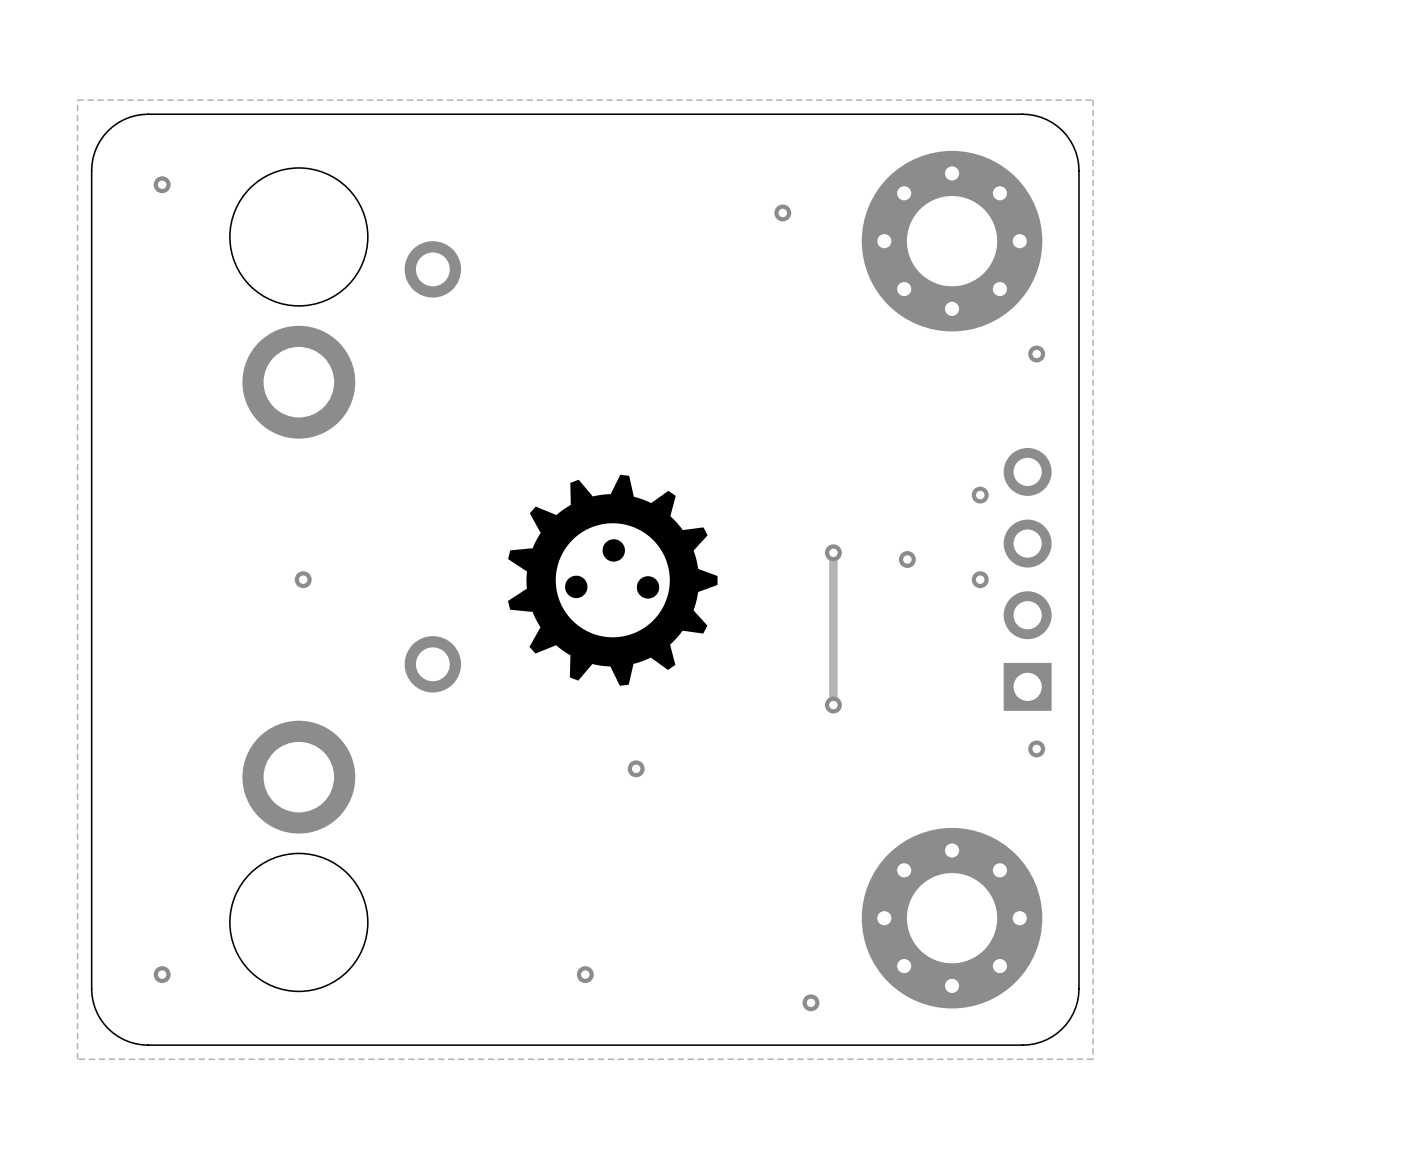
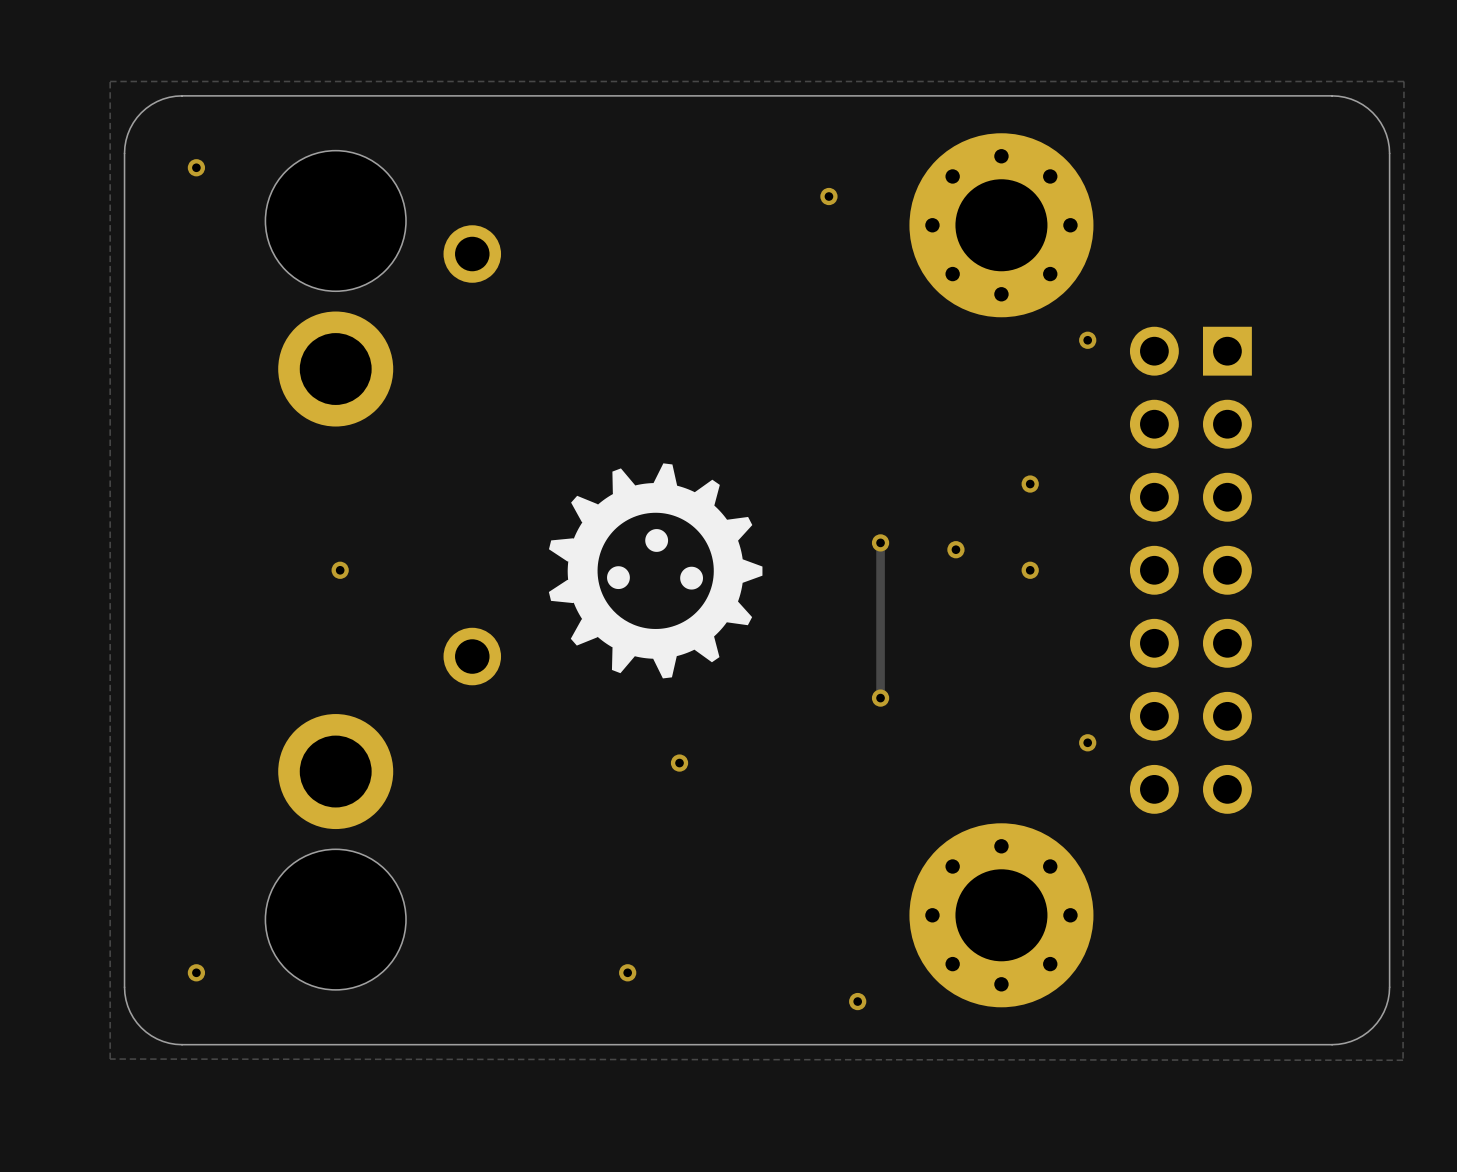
zone outline: (1093, 100) (1093, 1059) (77, 1059) -> (1145, 81) (1403, 81) (1403, 1060) (110, 1059)
board edge: (1022, 114) (1041, 117) (1062, 130) (1075, 152) (1078, 170) (1078, 995) (1073, 1013) (1062, 1028) (1047, 1039) (1022, 1045) -> (1073, 95) (1344, 97) (1362, 104) (1377, 117) (1386, 134) (1389, 153) (1389, 987) (1386, 1006) (1377, 1023) (1367, 1032) (1357, 1038) (1338, 1044) (1073, 1044)
part: (1027, 579) -> none
part: none -> (1190, 570)

